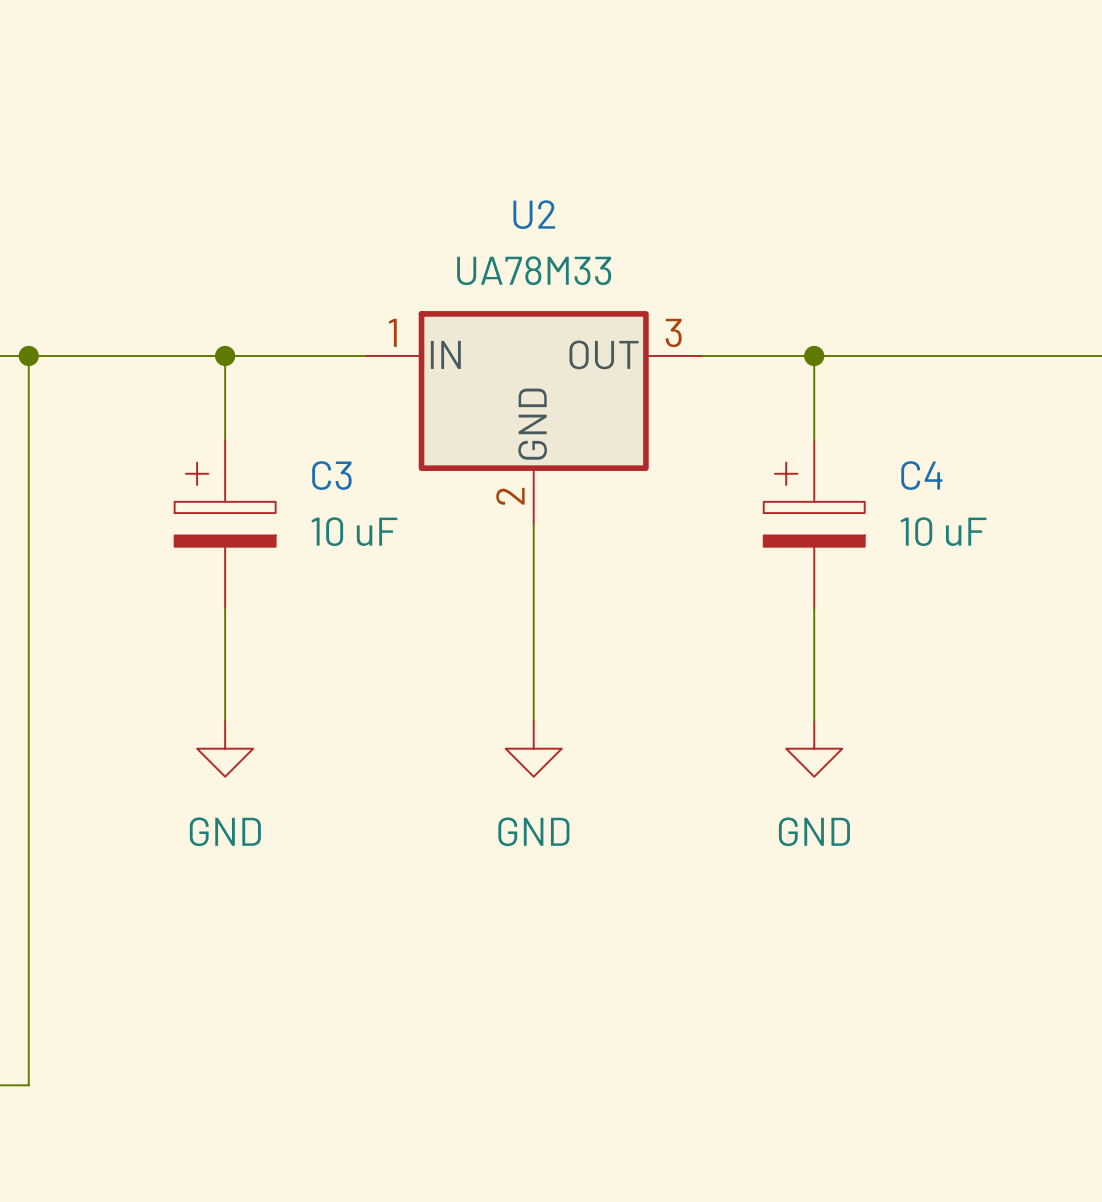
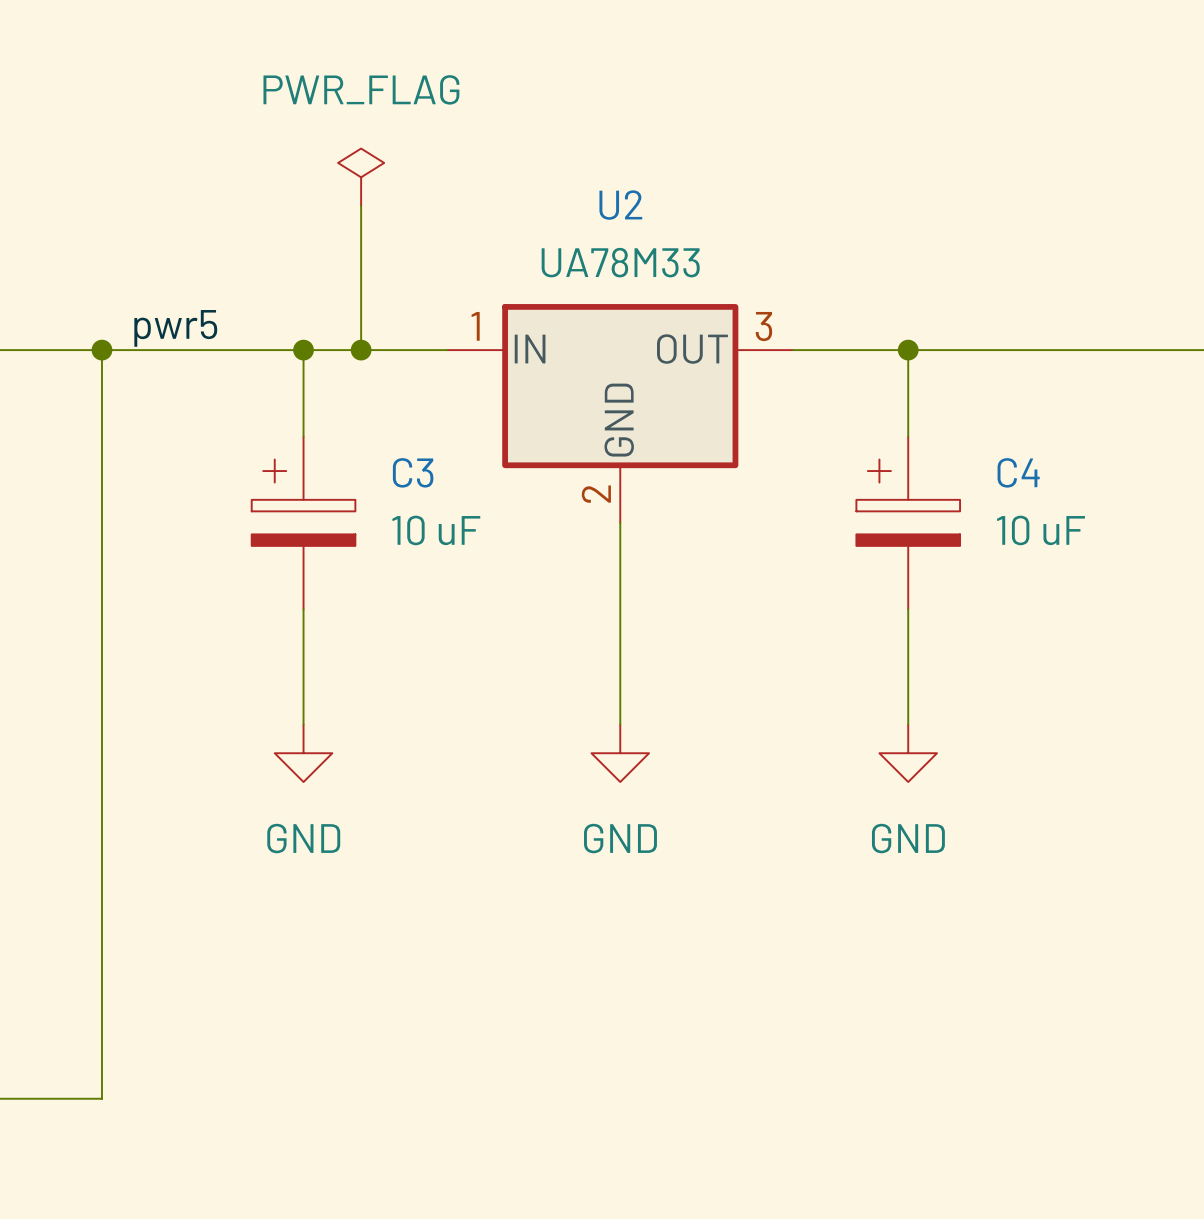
power symbol: none -> PWR_FLAG (361, 177)
wire: none -> (361, 206) (361, 350)
label: none -> pwr5 (175, 328)
junction: none -> (361, 350)

